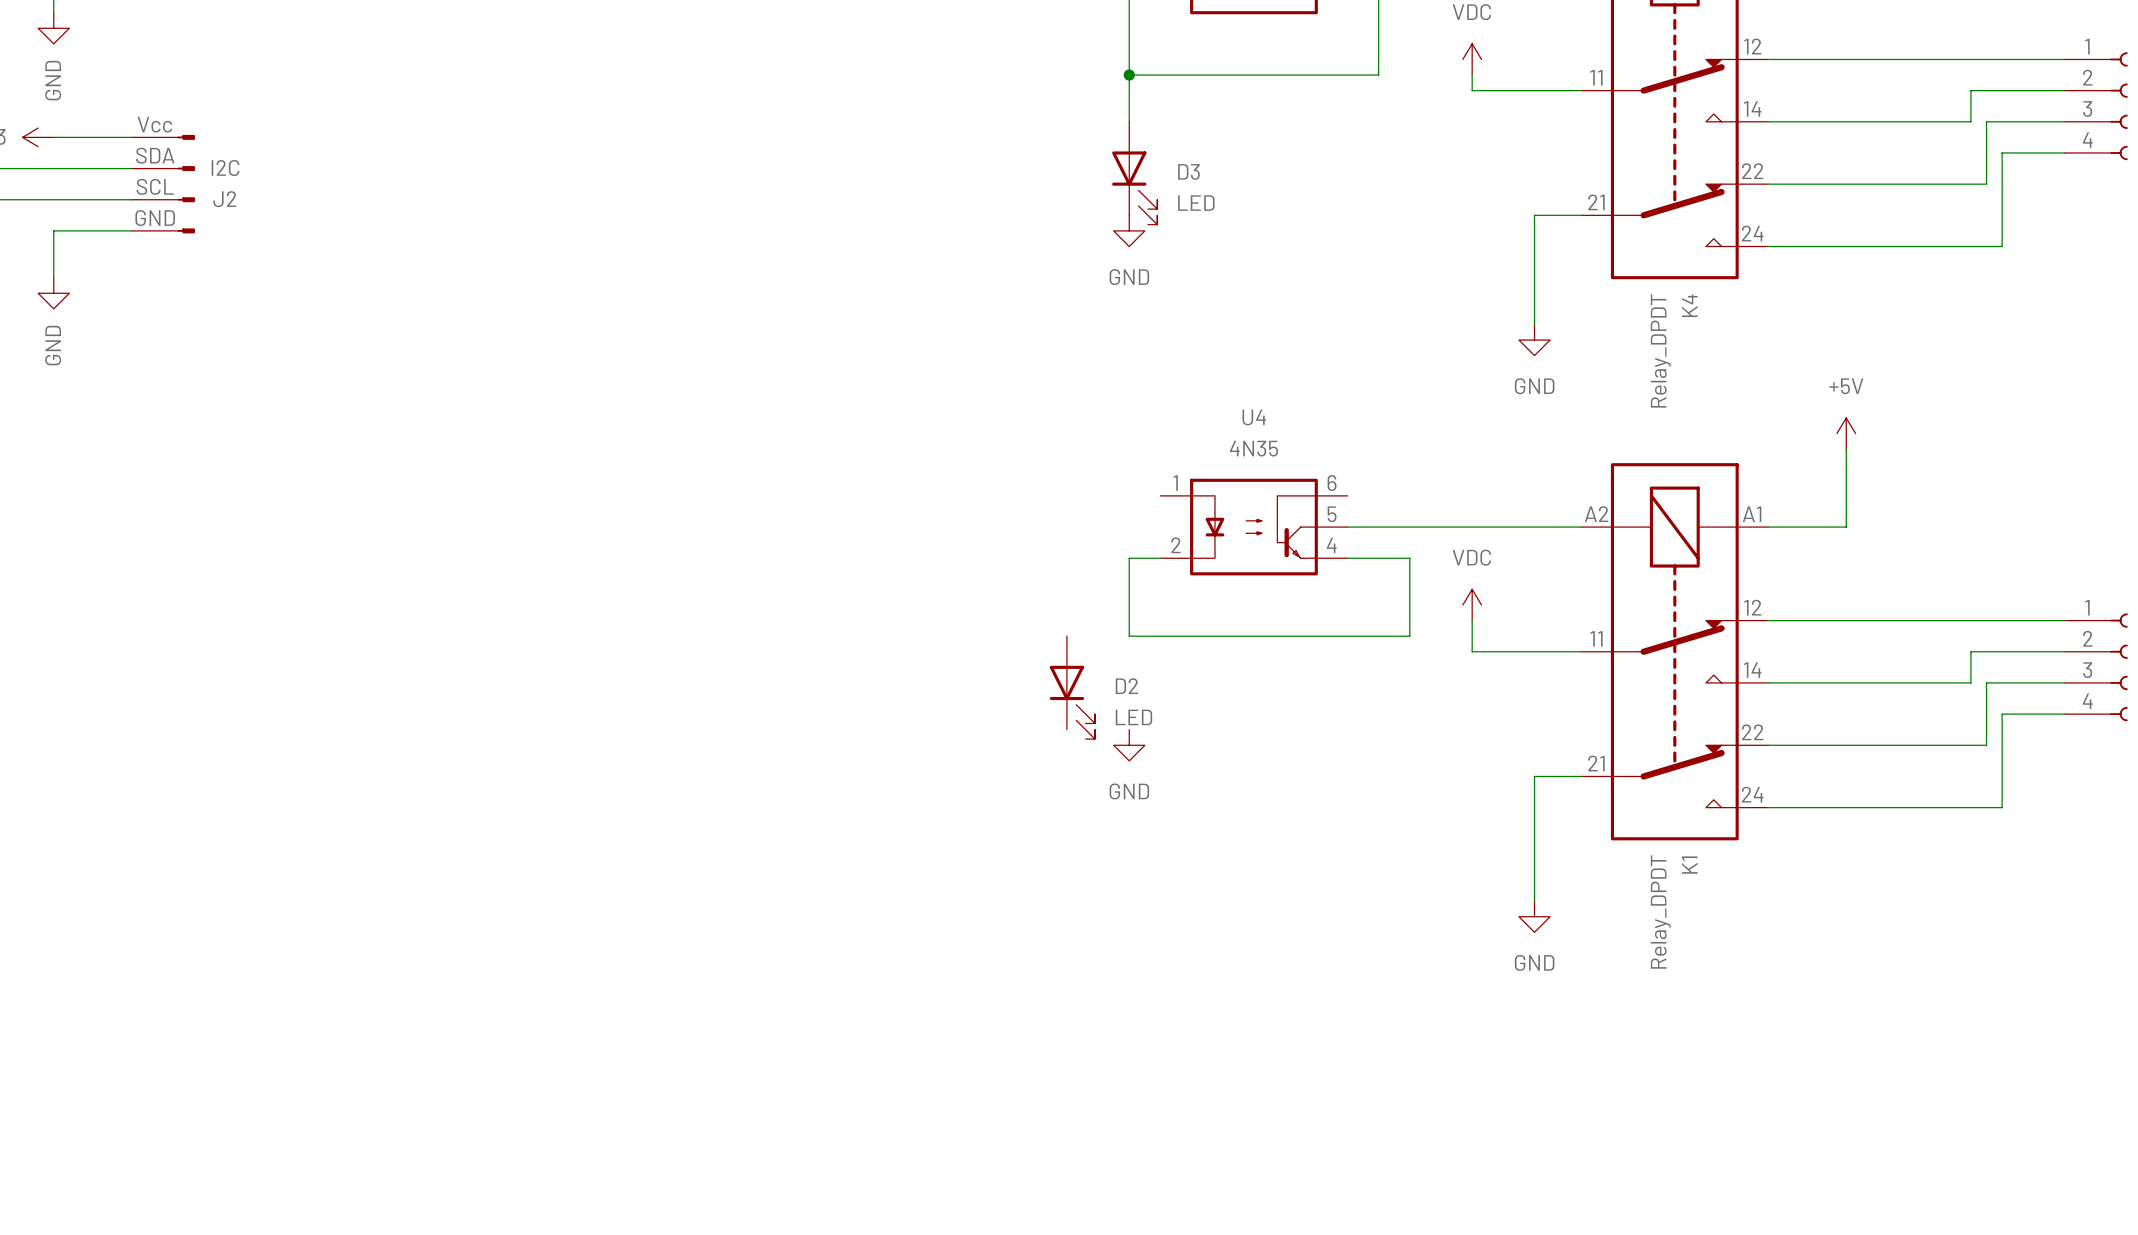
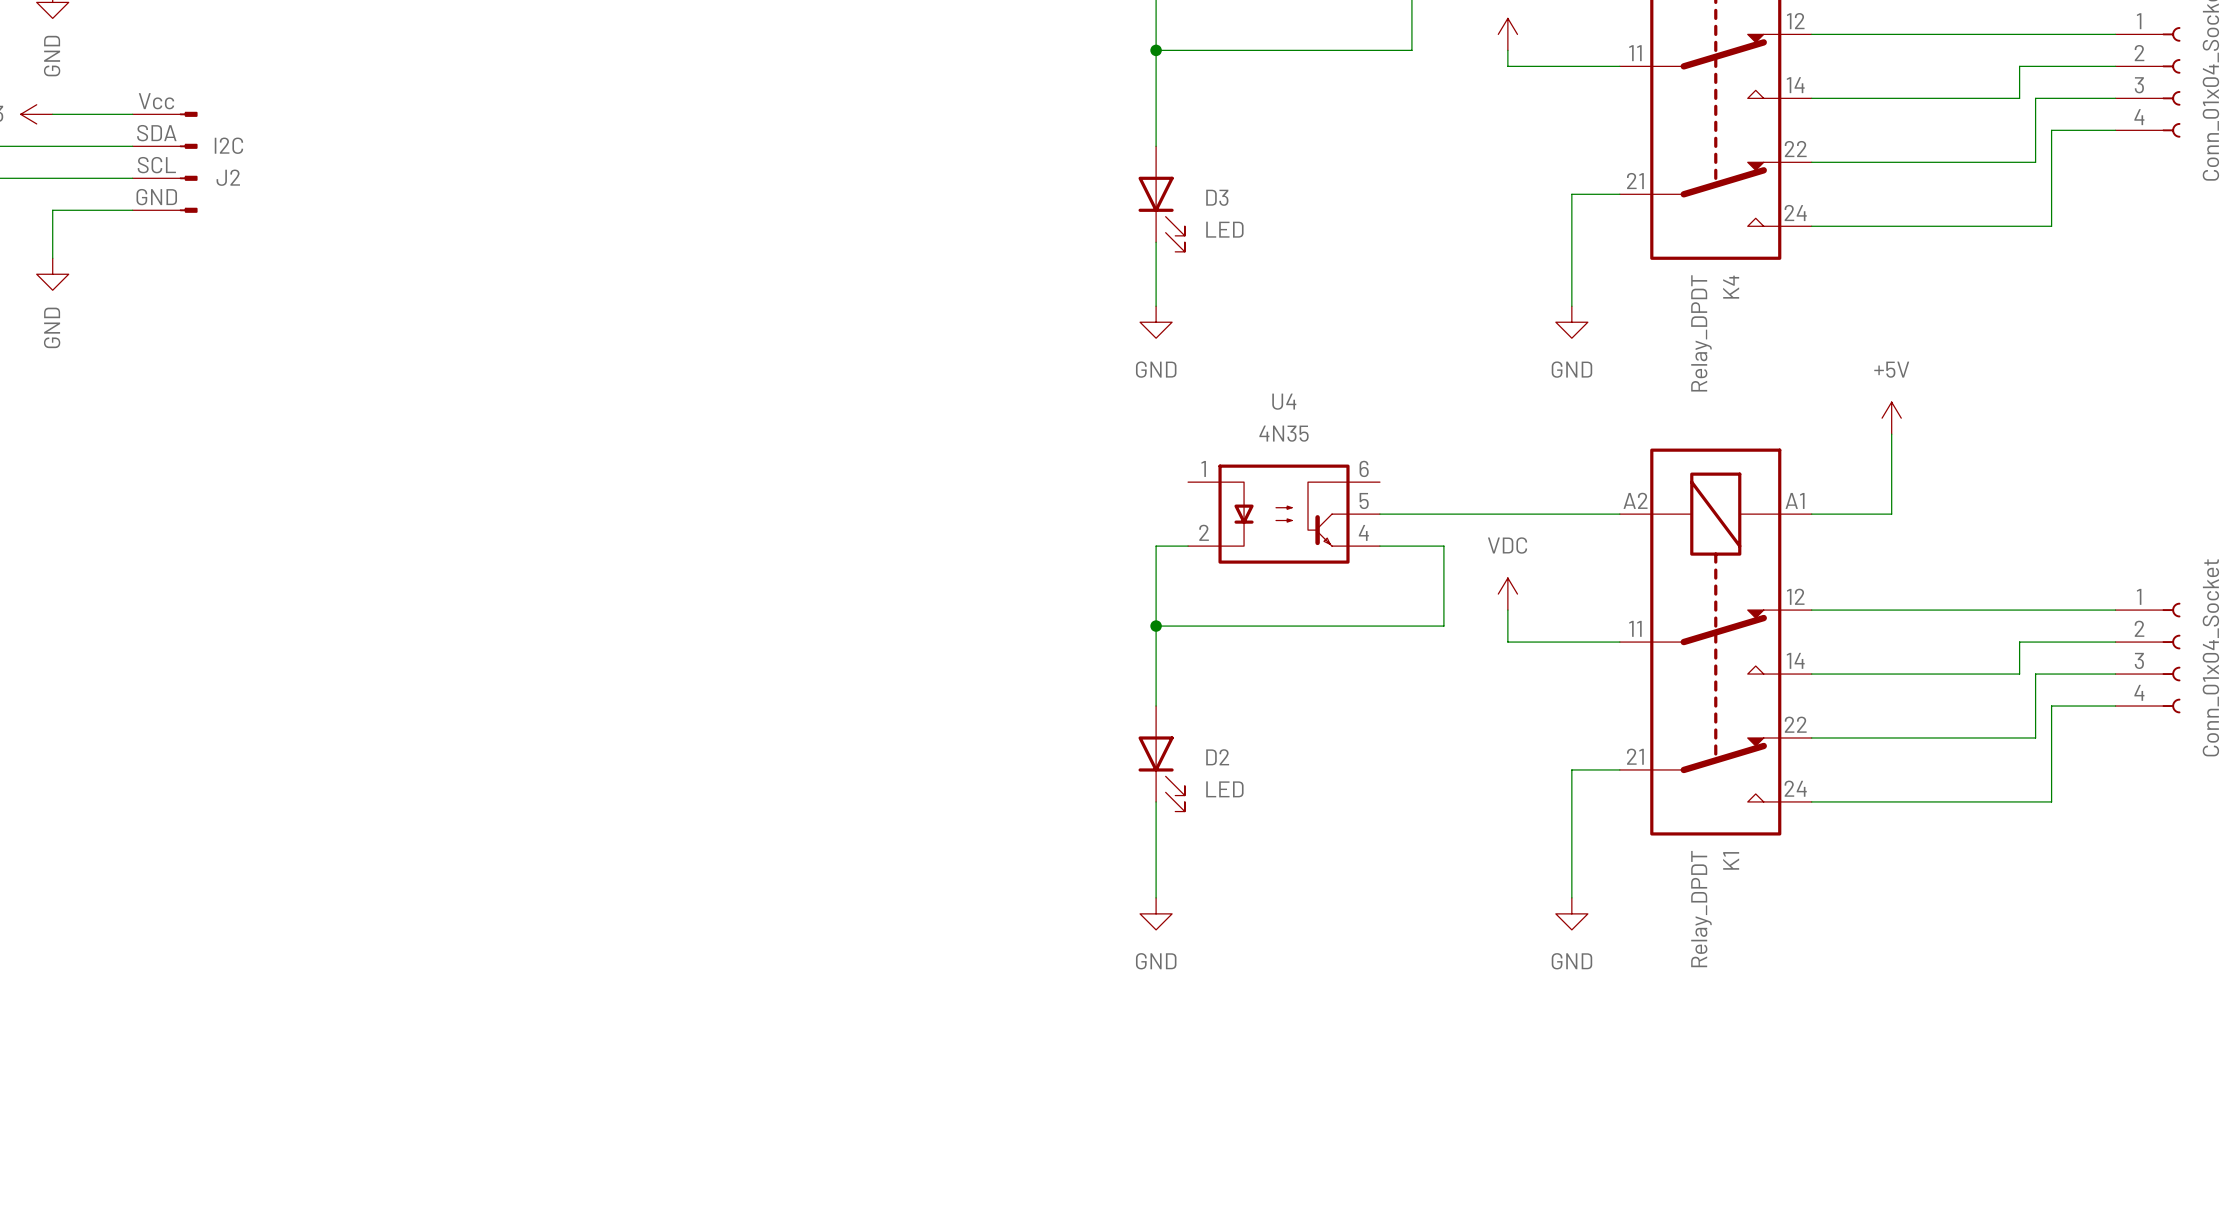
D3 position: (1134, 173) -> (1161, 199)
power symbol position: GND (1129, 230) -> GND (1156, 322)
wire: none -> (1156, 242) (1156, 306)
wire: none -> (1156, 626) (1156, 706)
junction: none -> (1156, 626)
D2 position: (1072, 687) -> (1161, 758)
power symbol position: GND (1129, 745) -> GND (1156, 913)
wire: none -> (1156, 801) (1156, 897)

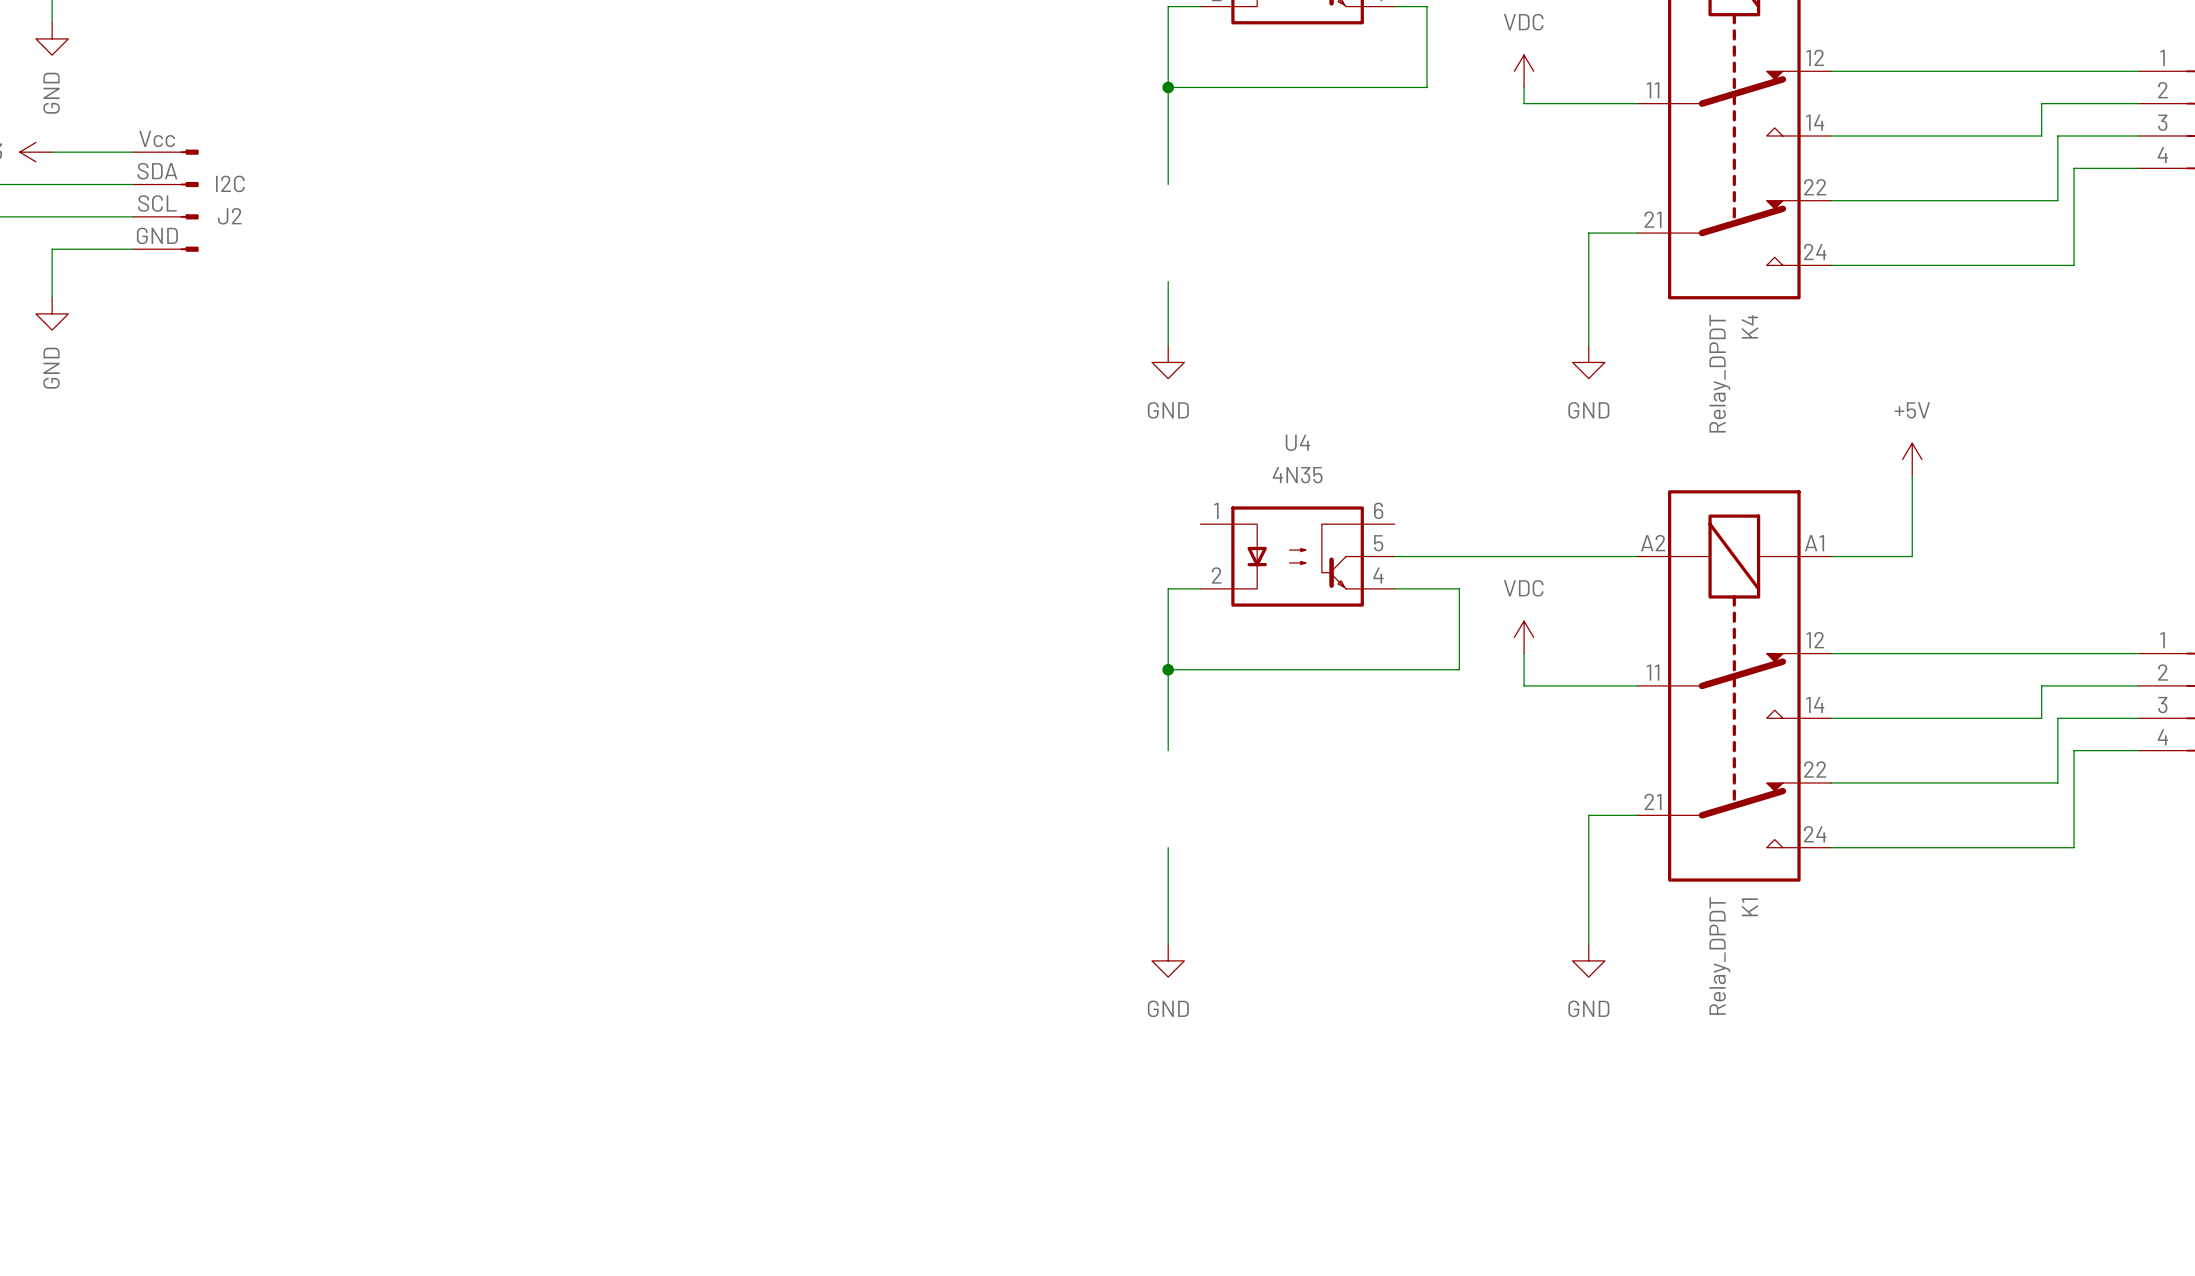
D3: LED (1161, 199) -> none
D2: LED (1161, 758) -> none

